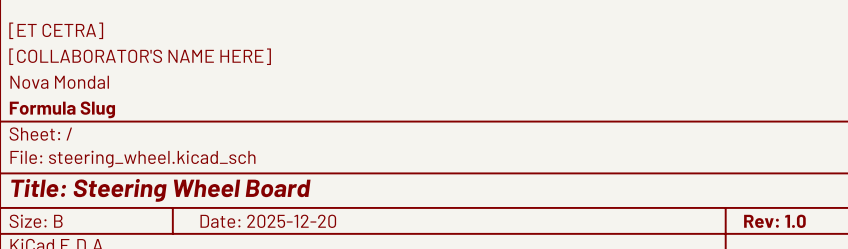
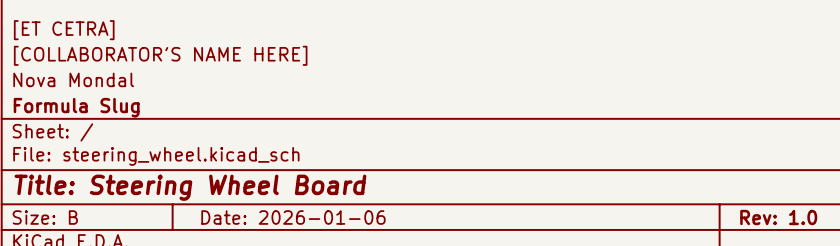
title block: Date: 2025-12-20 (268, 221) -> Date: 2026-01-06 (293, 217)

